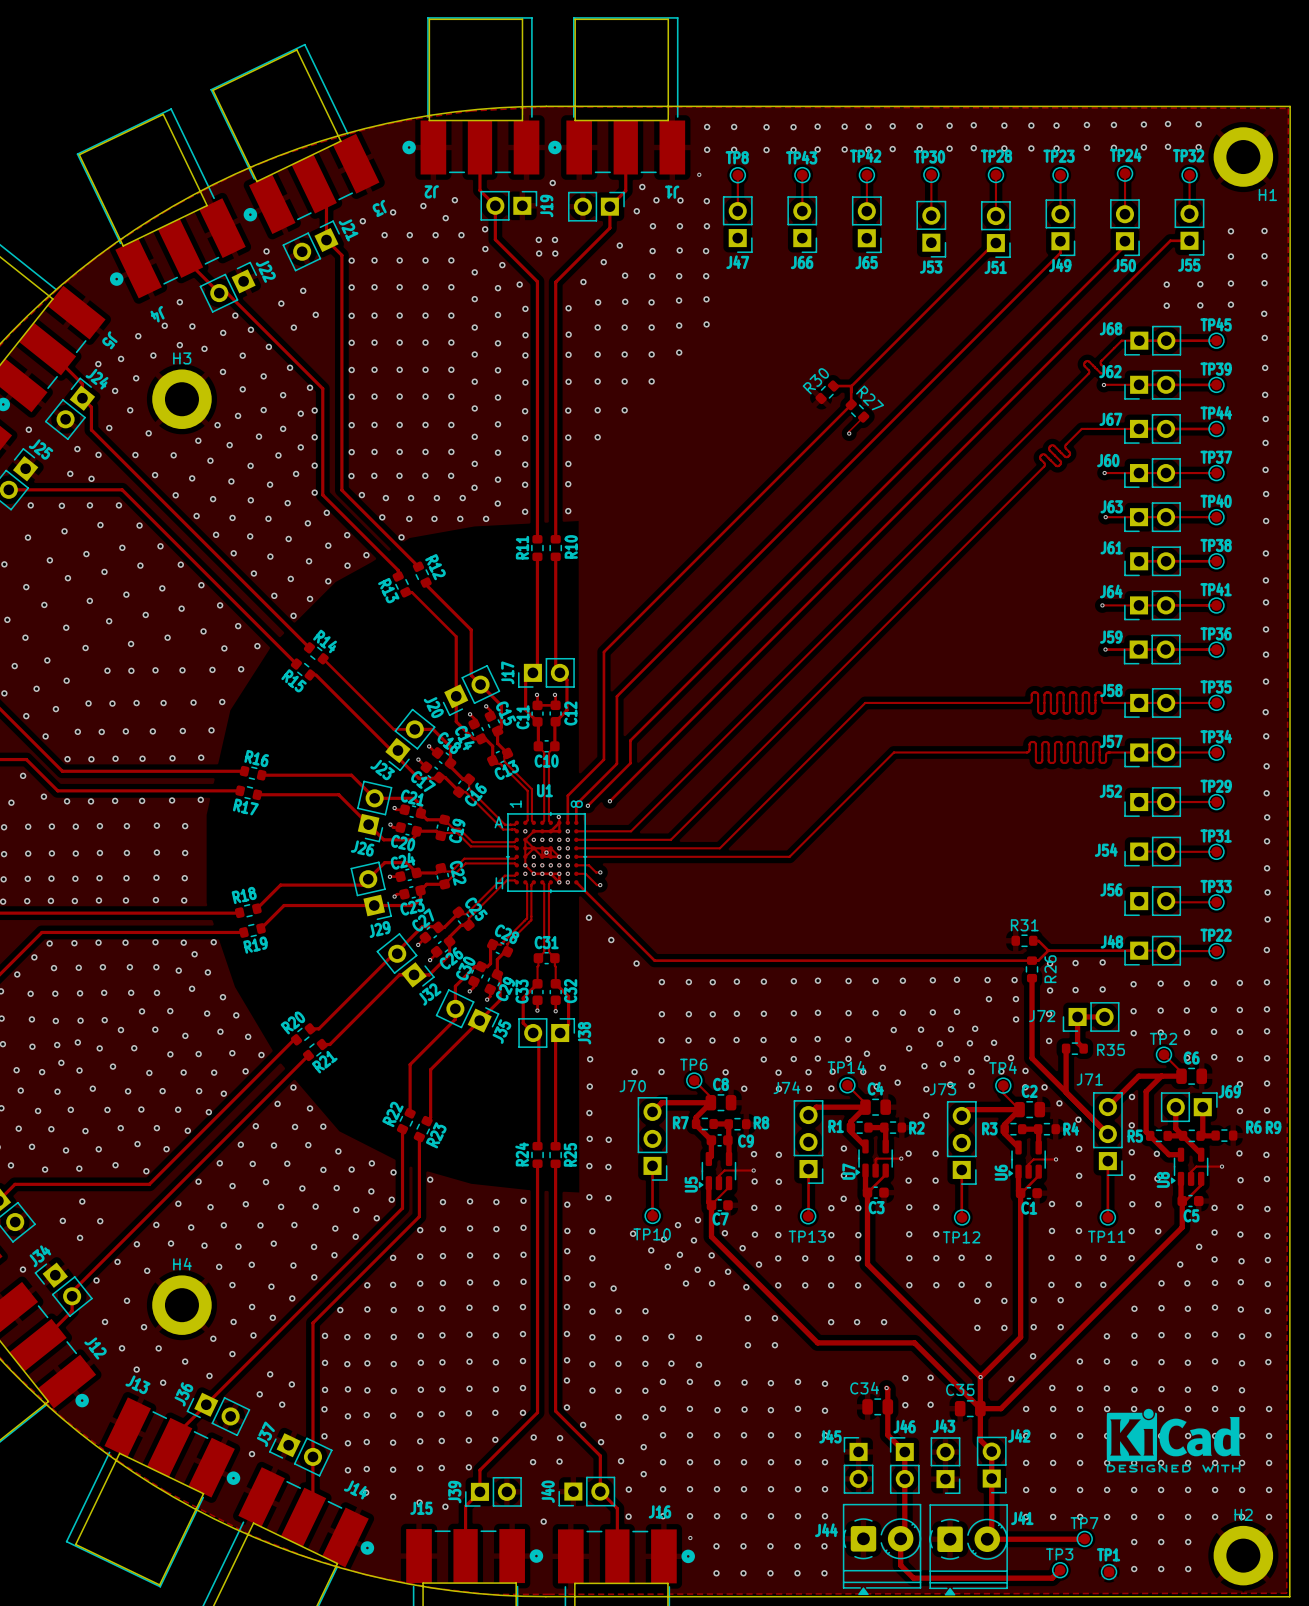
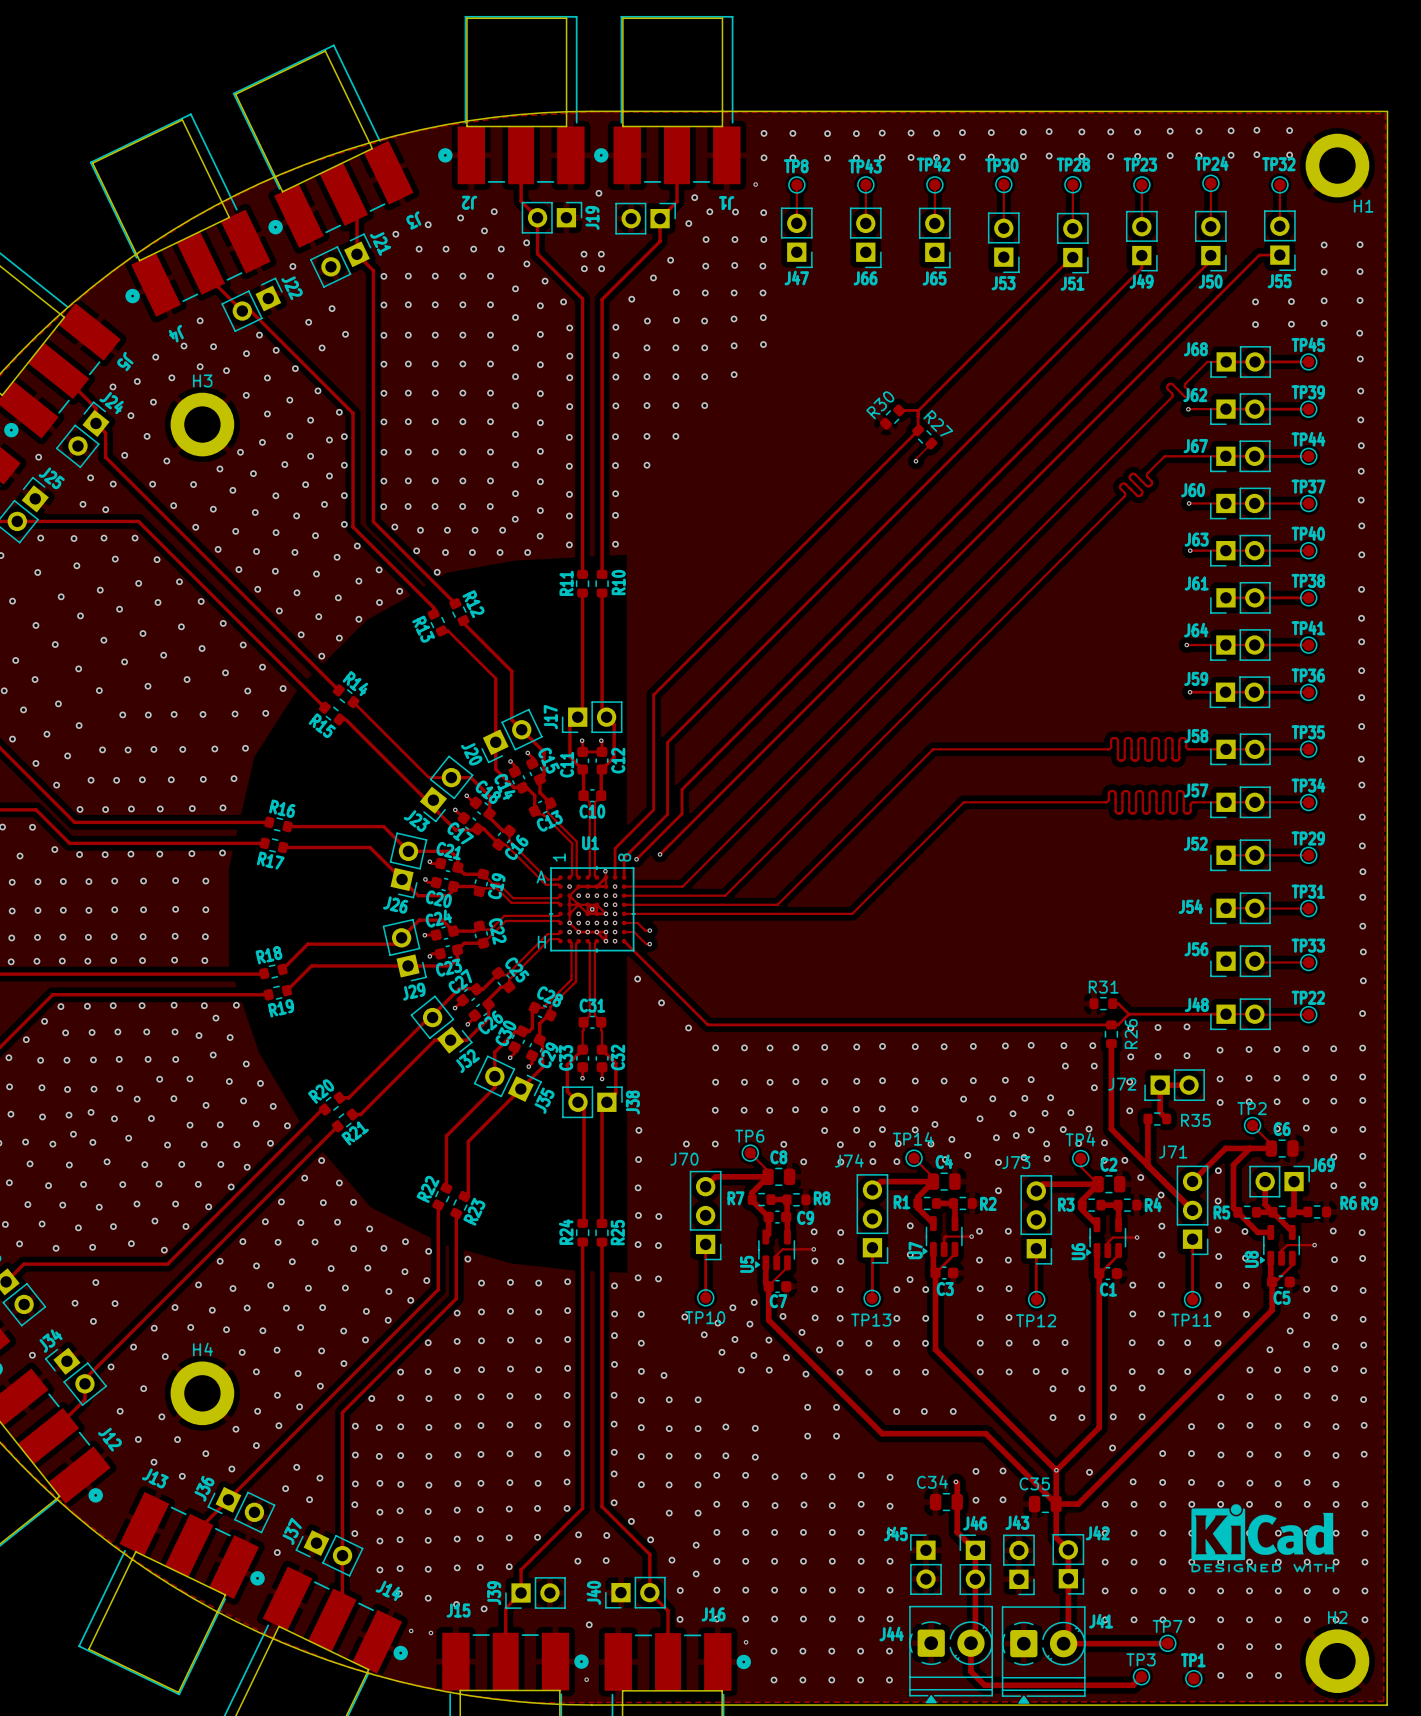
via: none -> (411, 1630)
via: none -> (430, 1632)
via: none -> (586, 1679)

